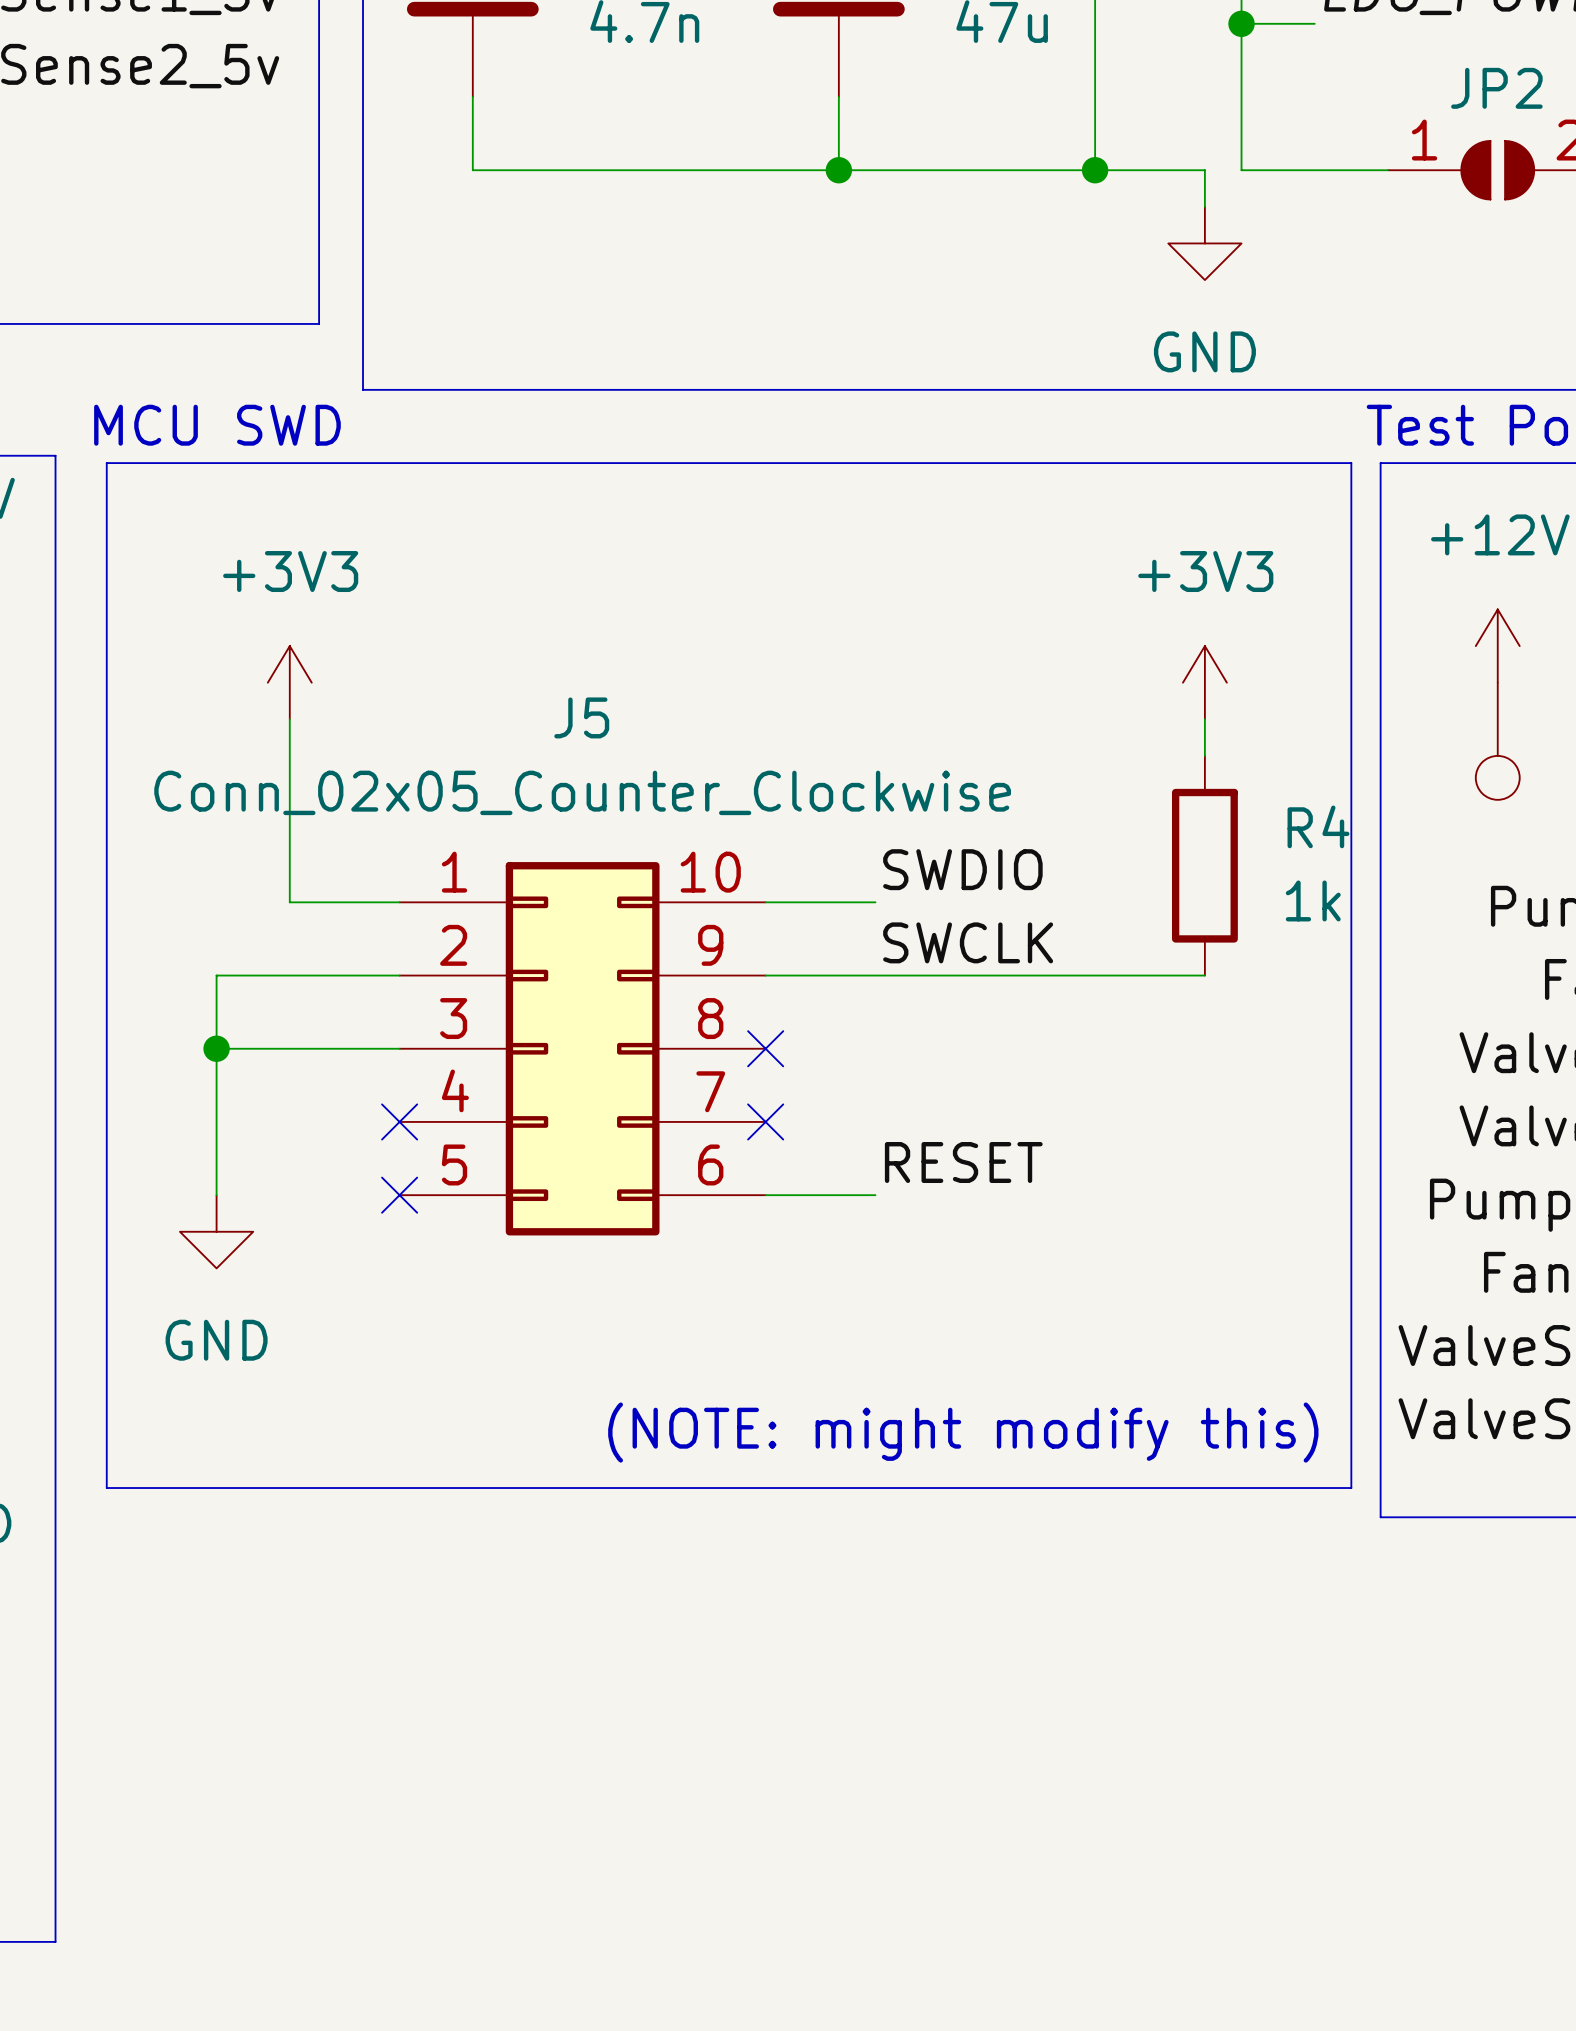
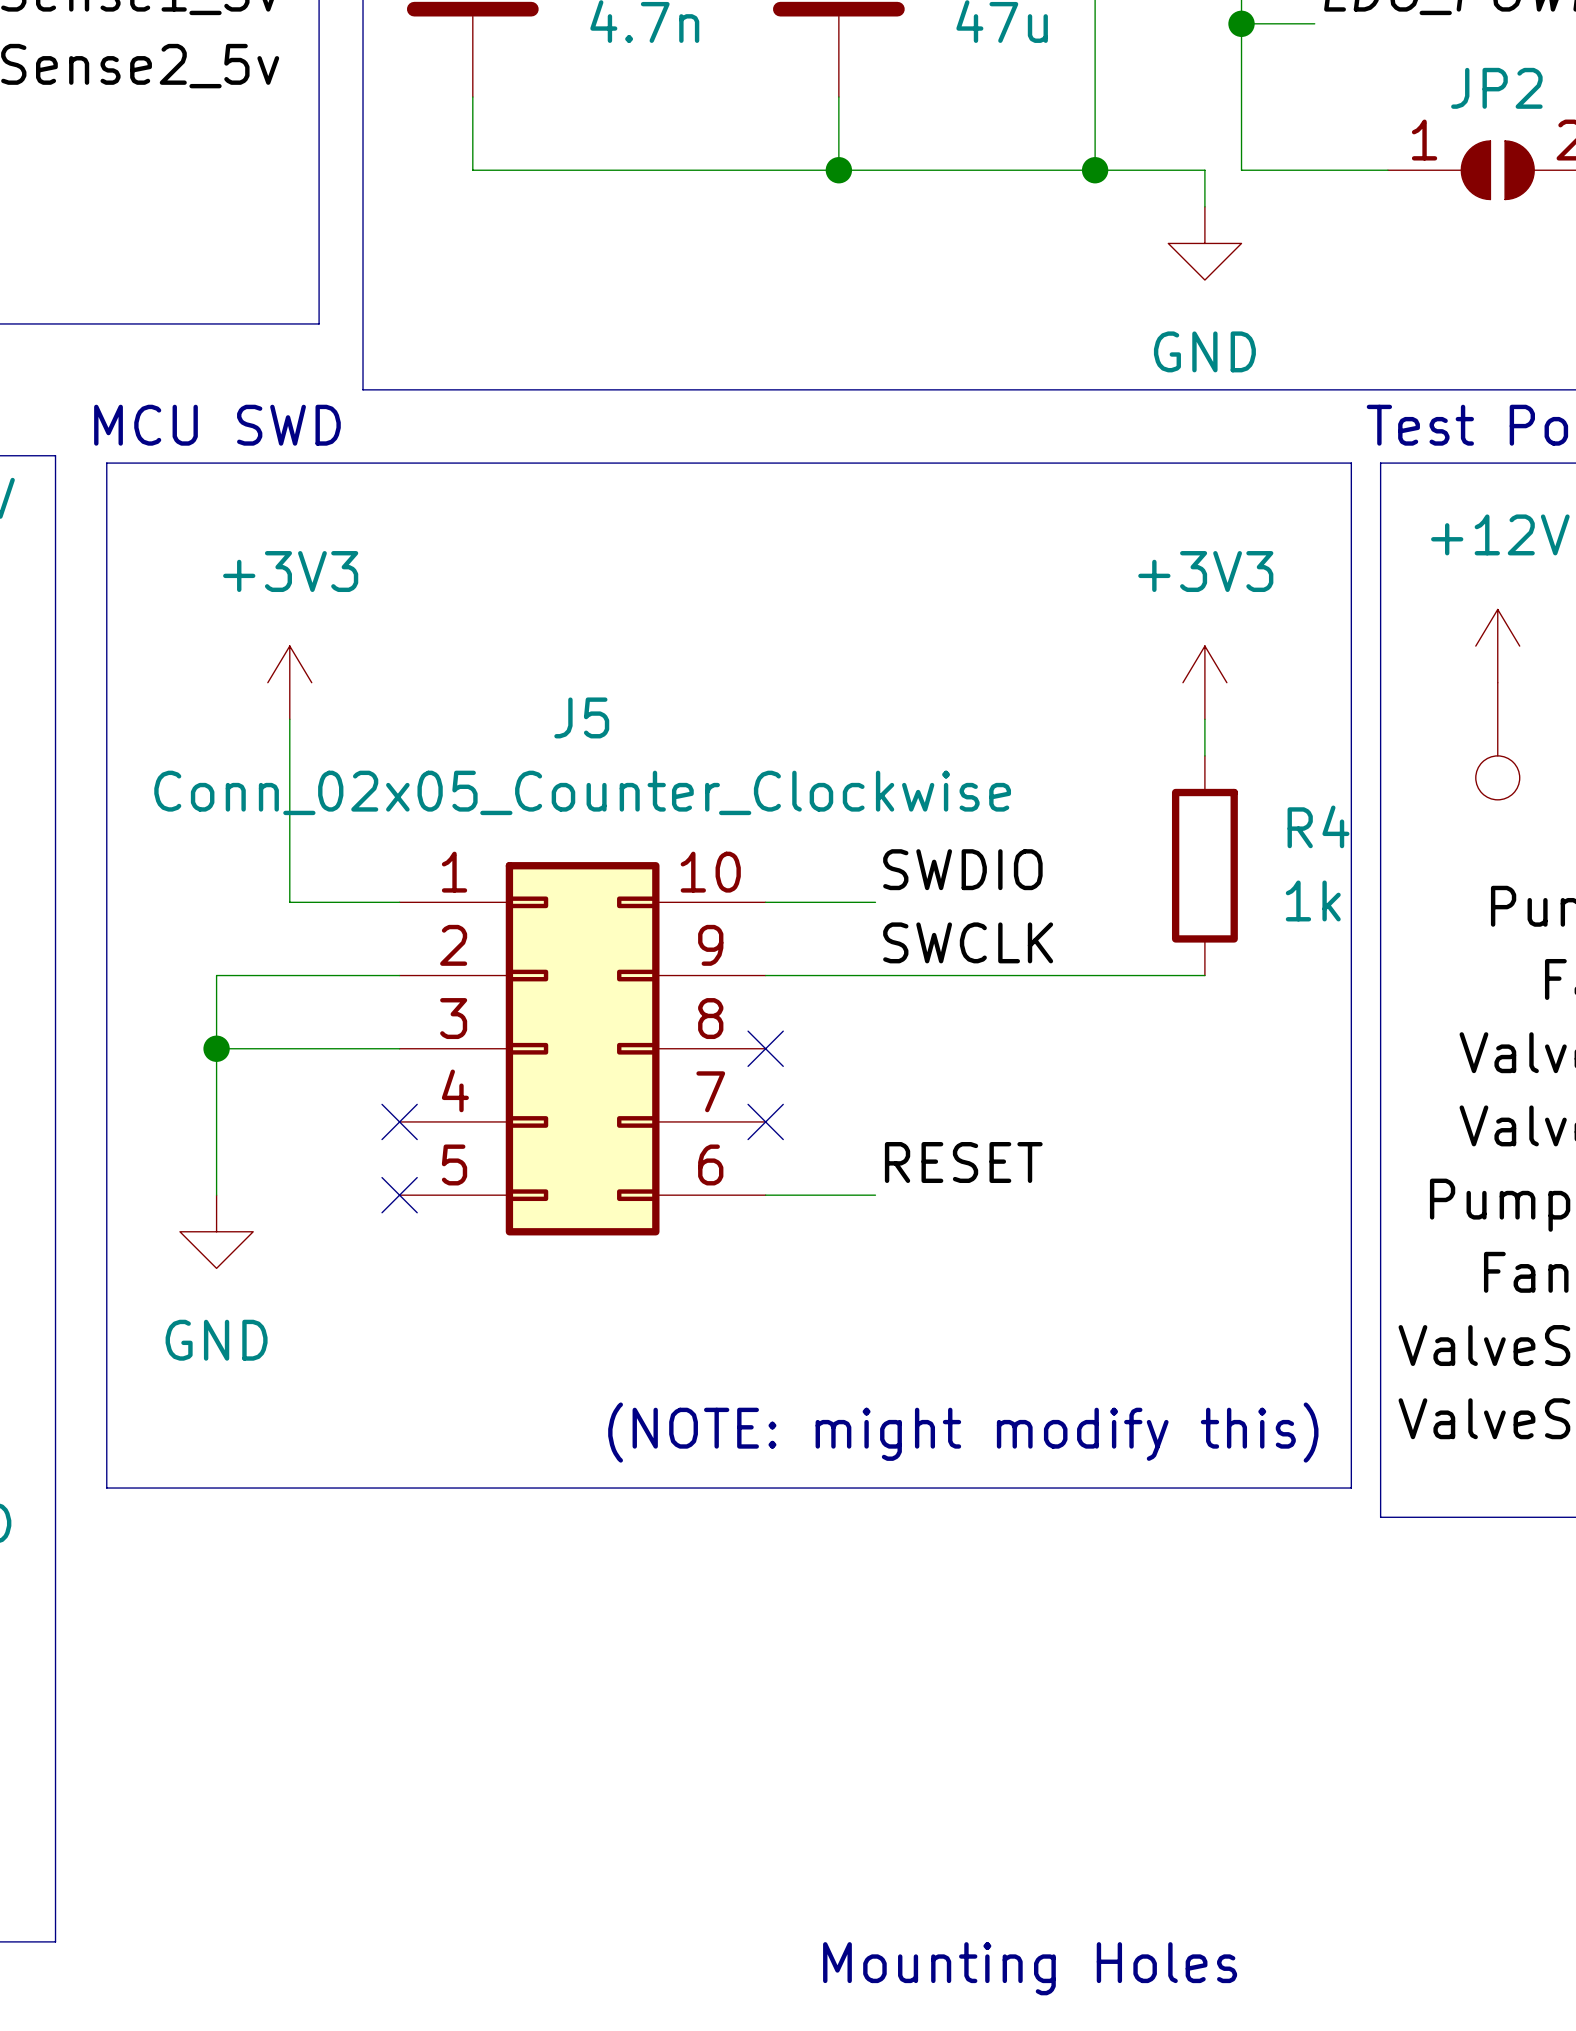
text: none -> Mounting Holes (1030, 1968)

